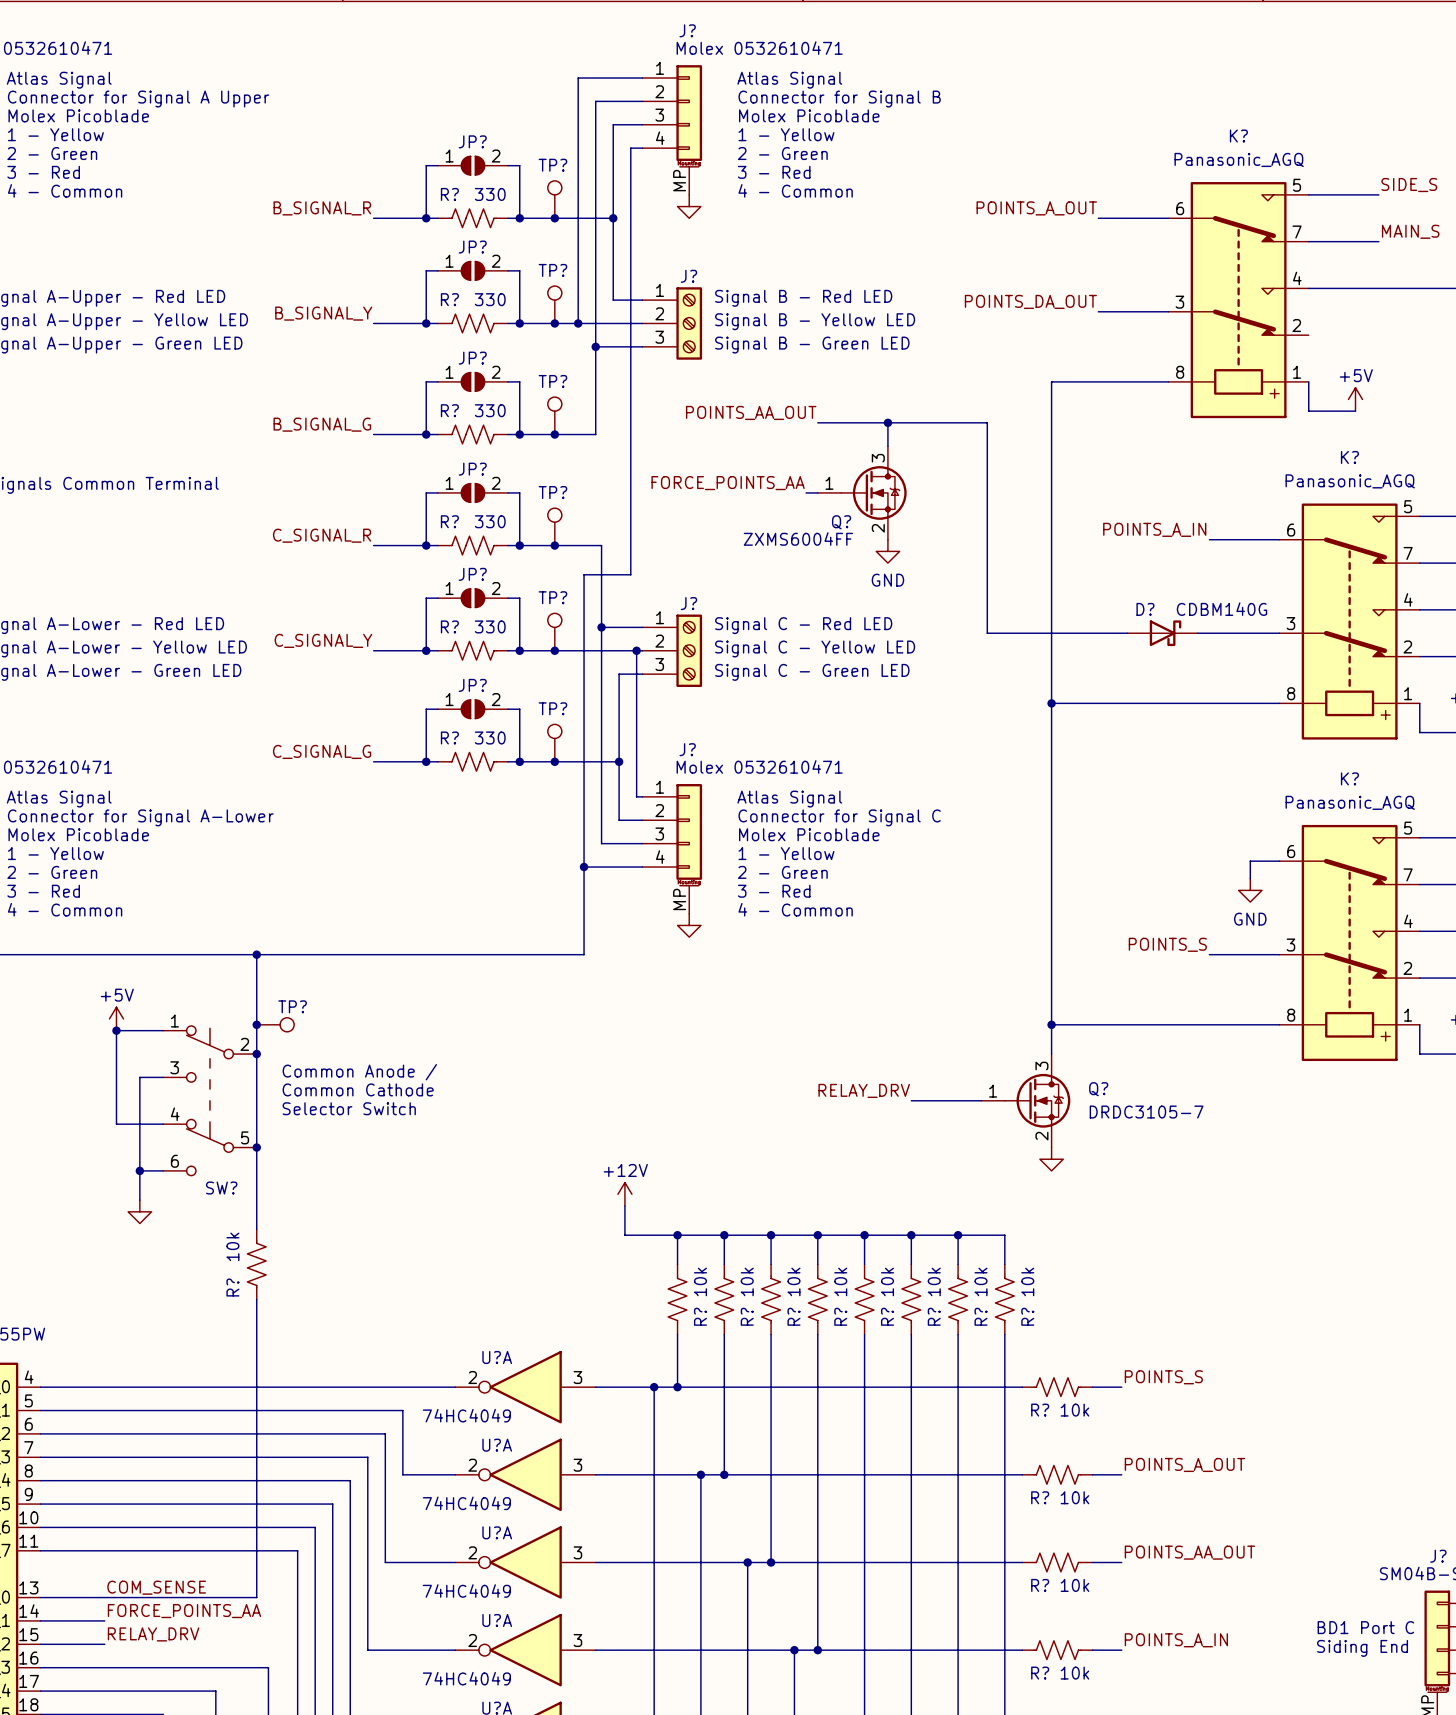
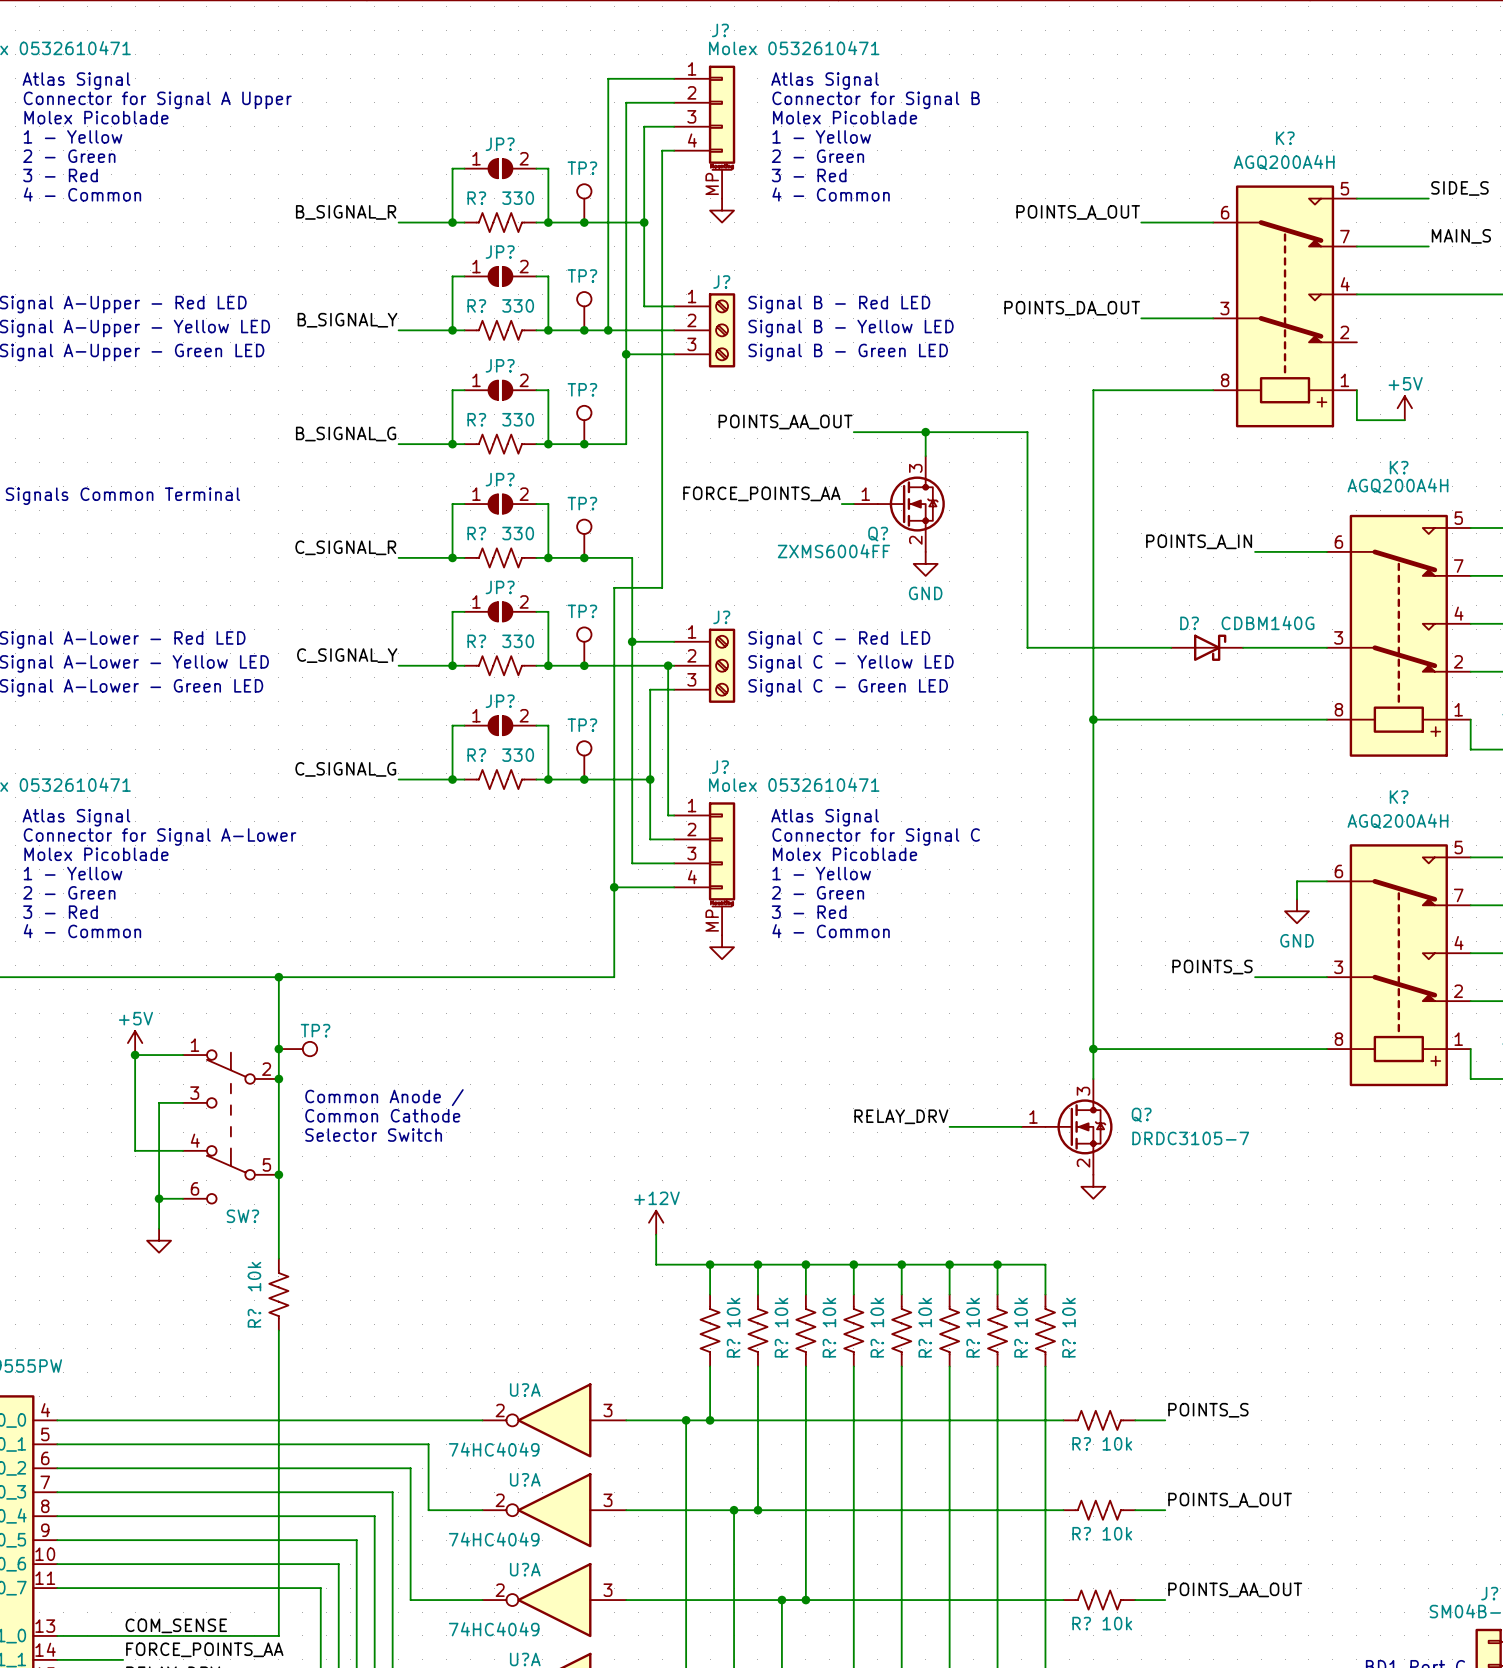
K? value: Panasonic_AGQ (1239, 159) -> AGQ200A4H (1284, 162)
K? value: Panasonic_AGQ (1350, 481) -> AGQ200A4H (1397, 485)
K? value: Panasonic_AGQ (1350, 802) -> AGQ200A4H (1397, 821)

